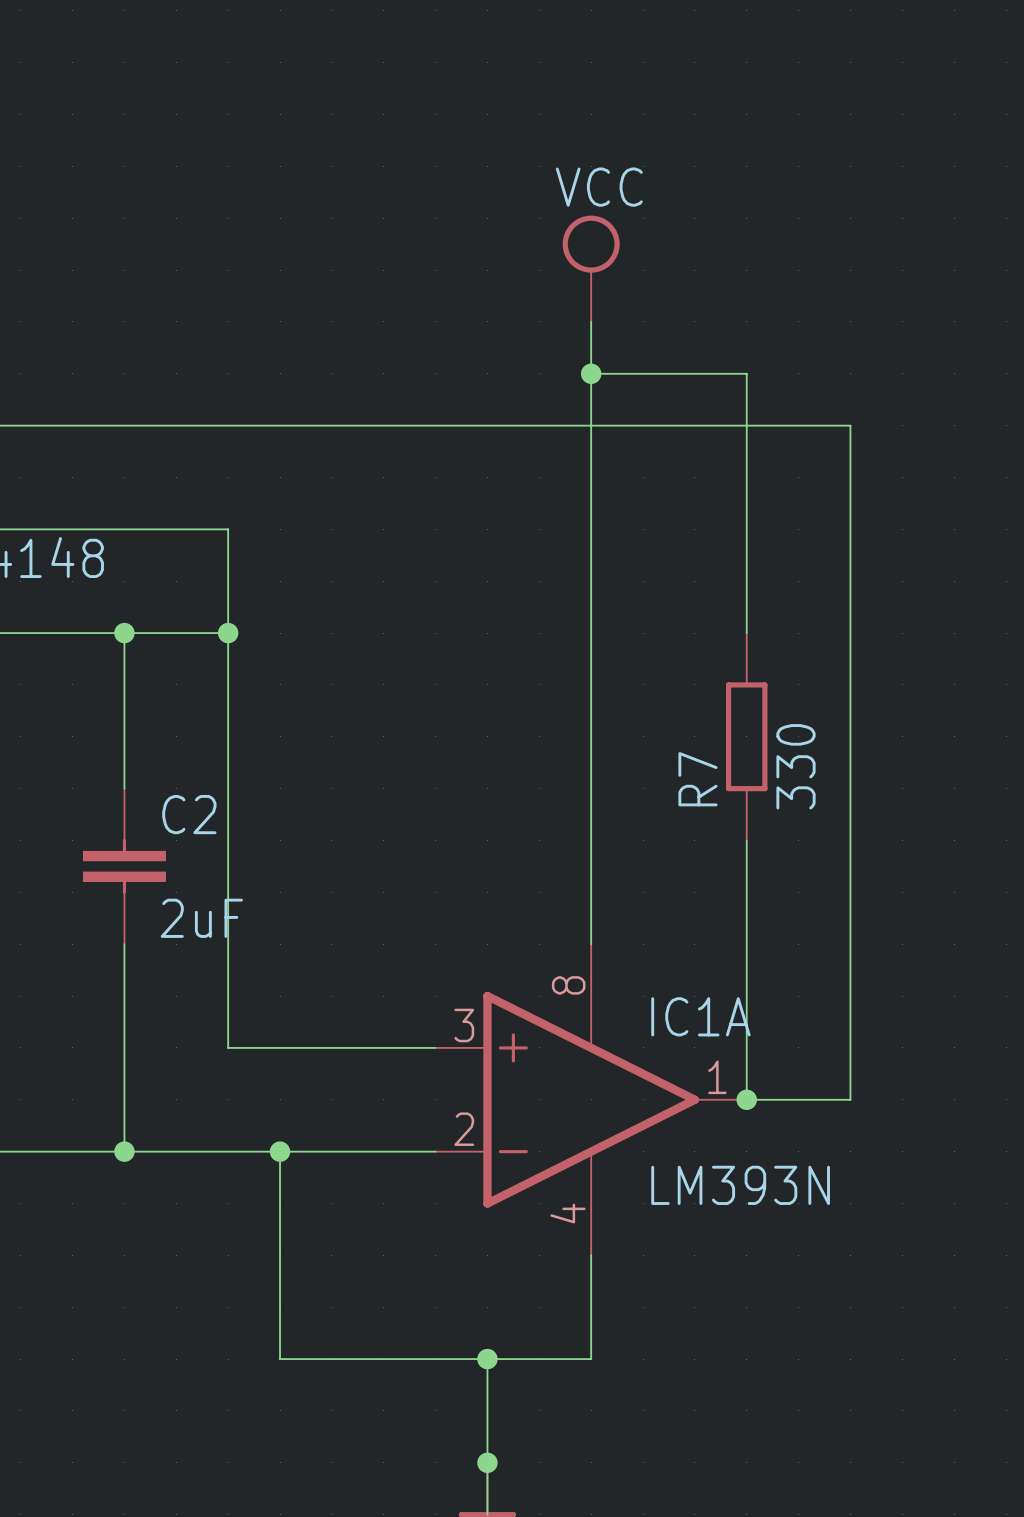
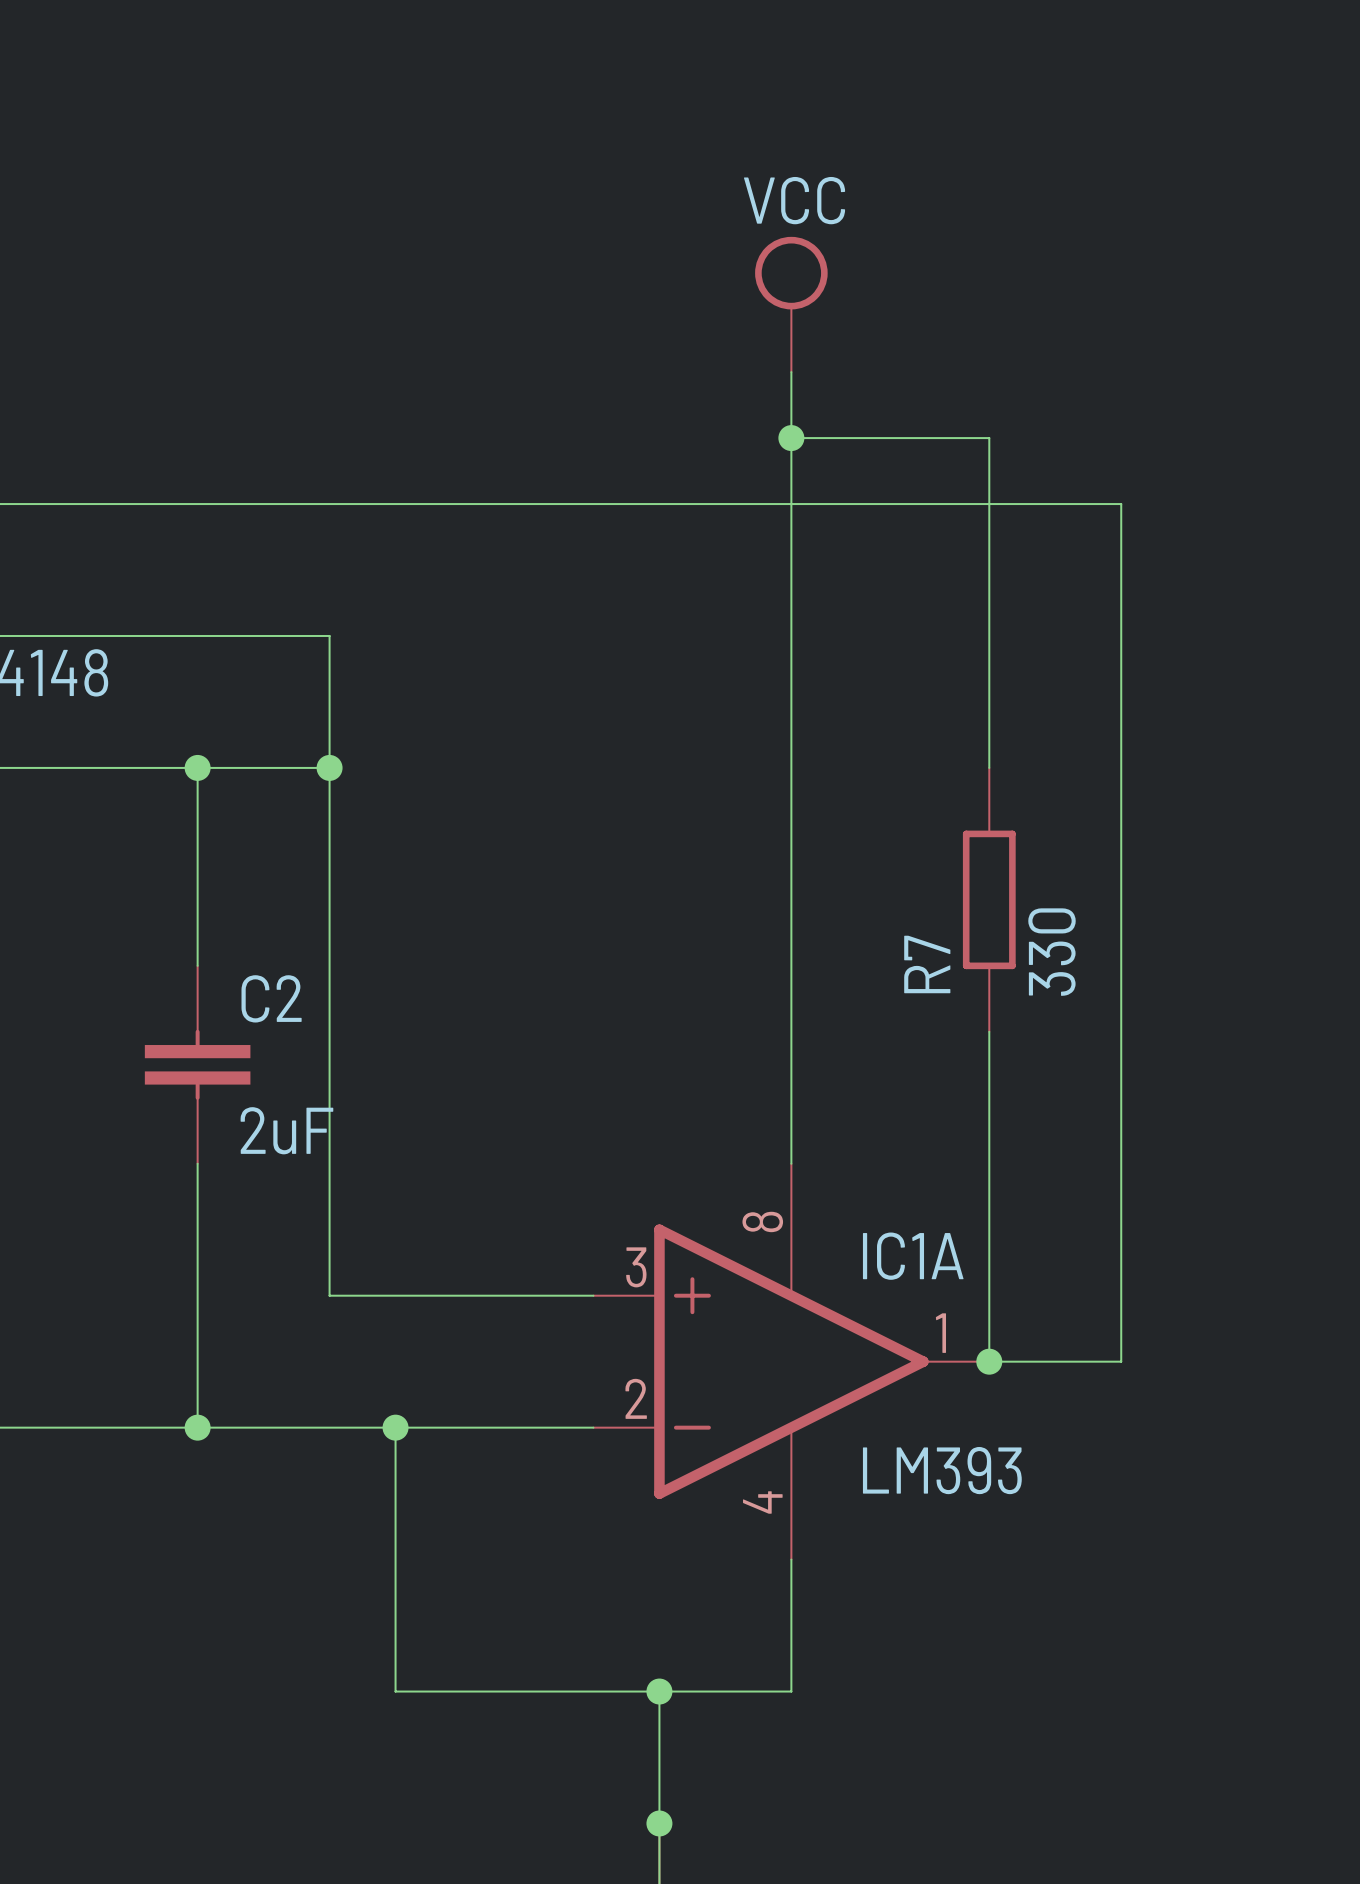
IC1A value: LM393N (740, 1185) -> LM393 (942, 1470)

